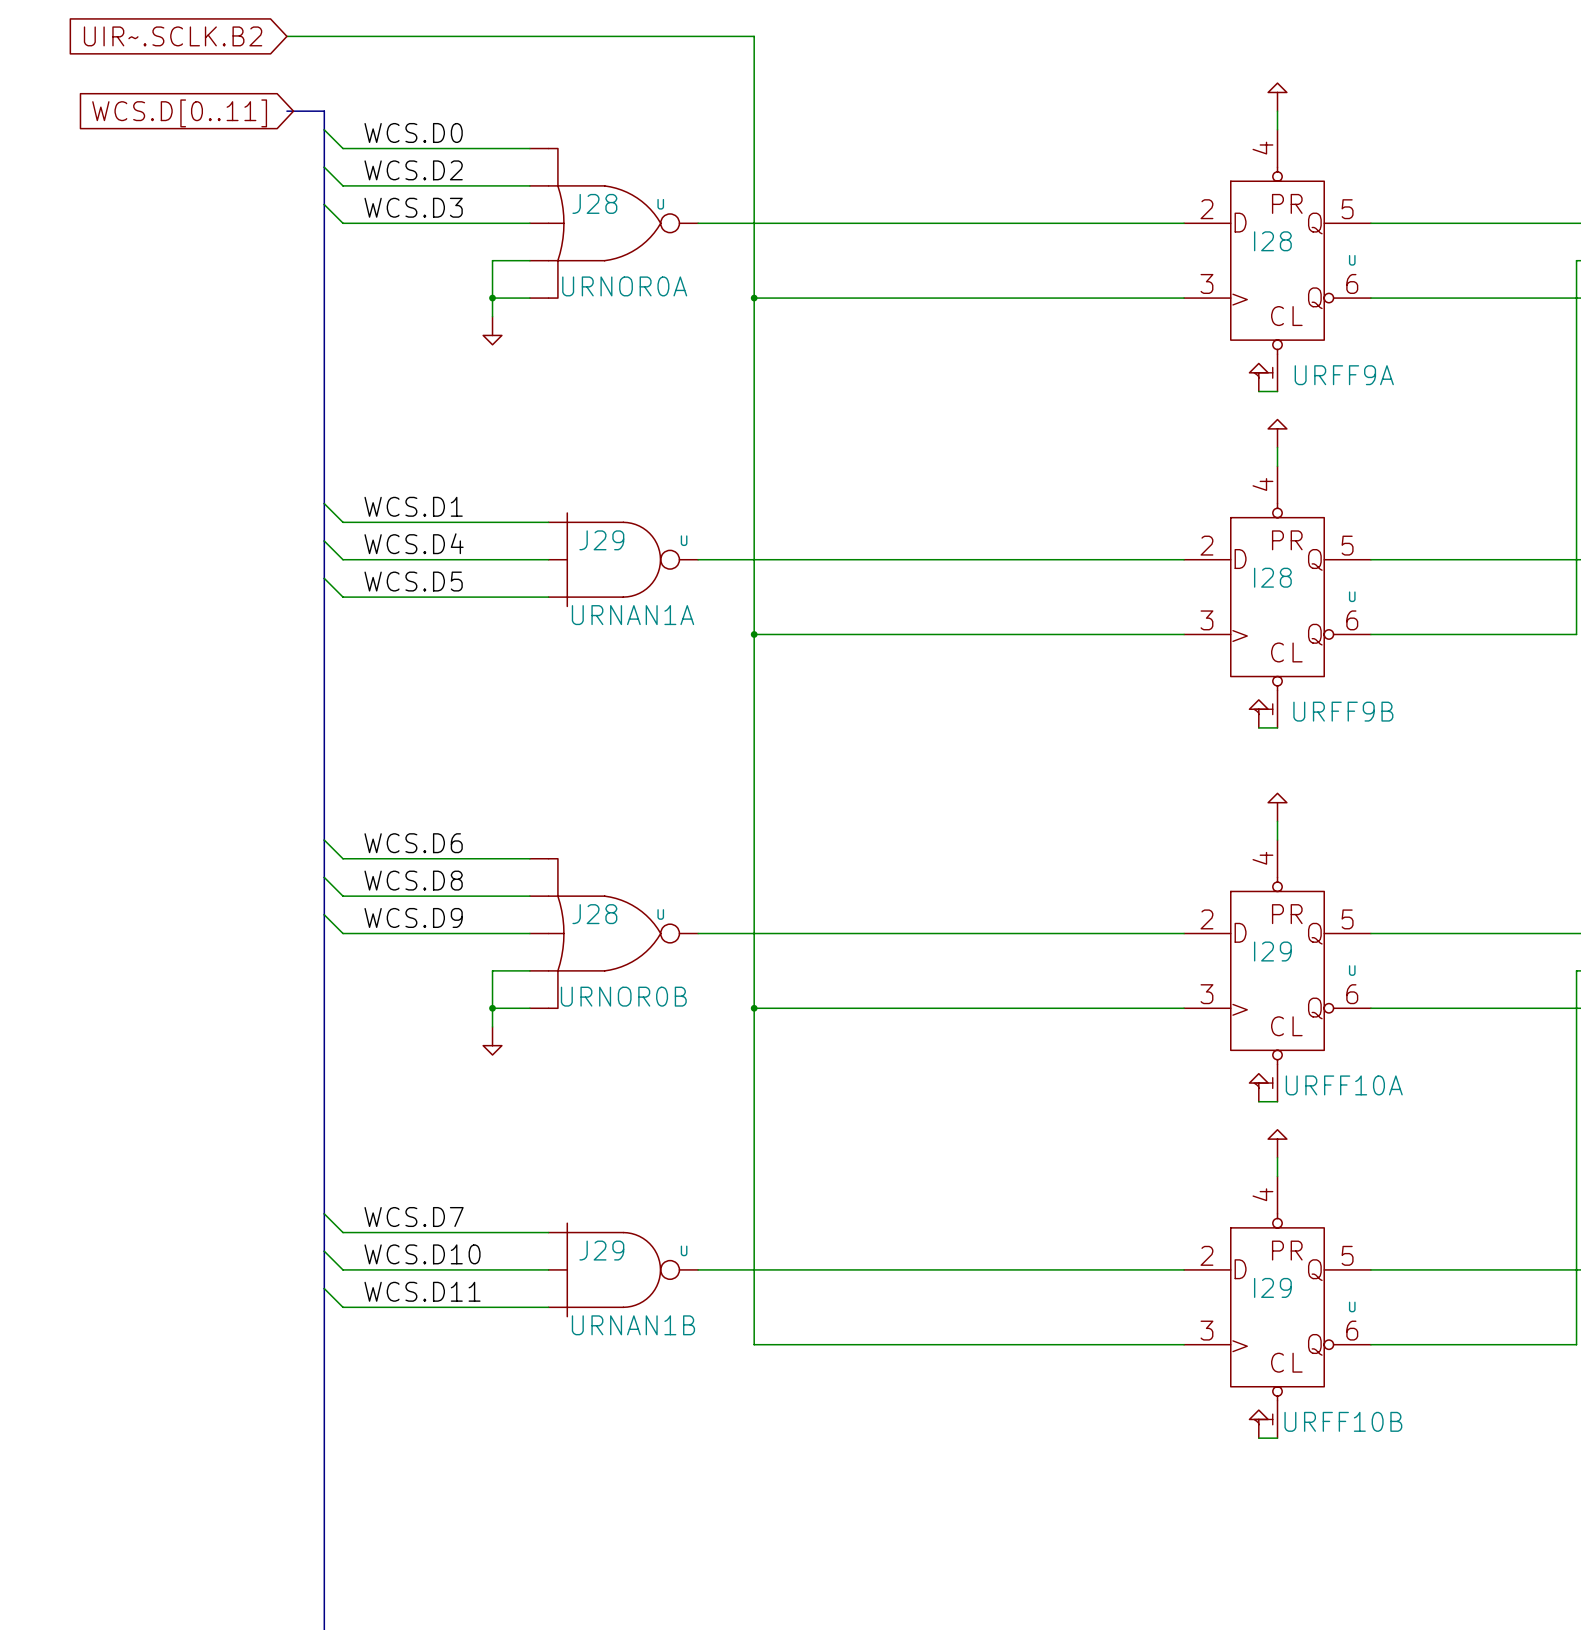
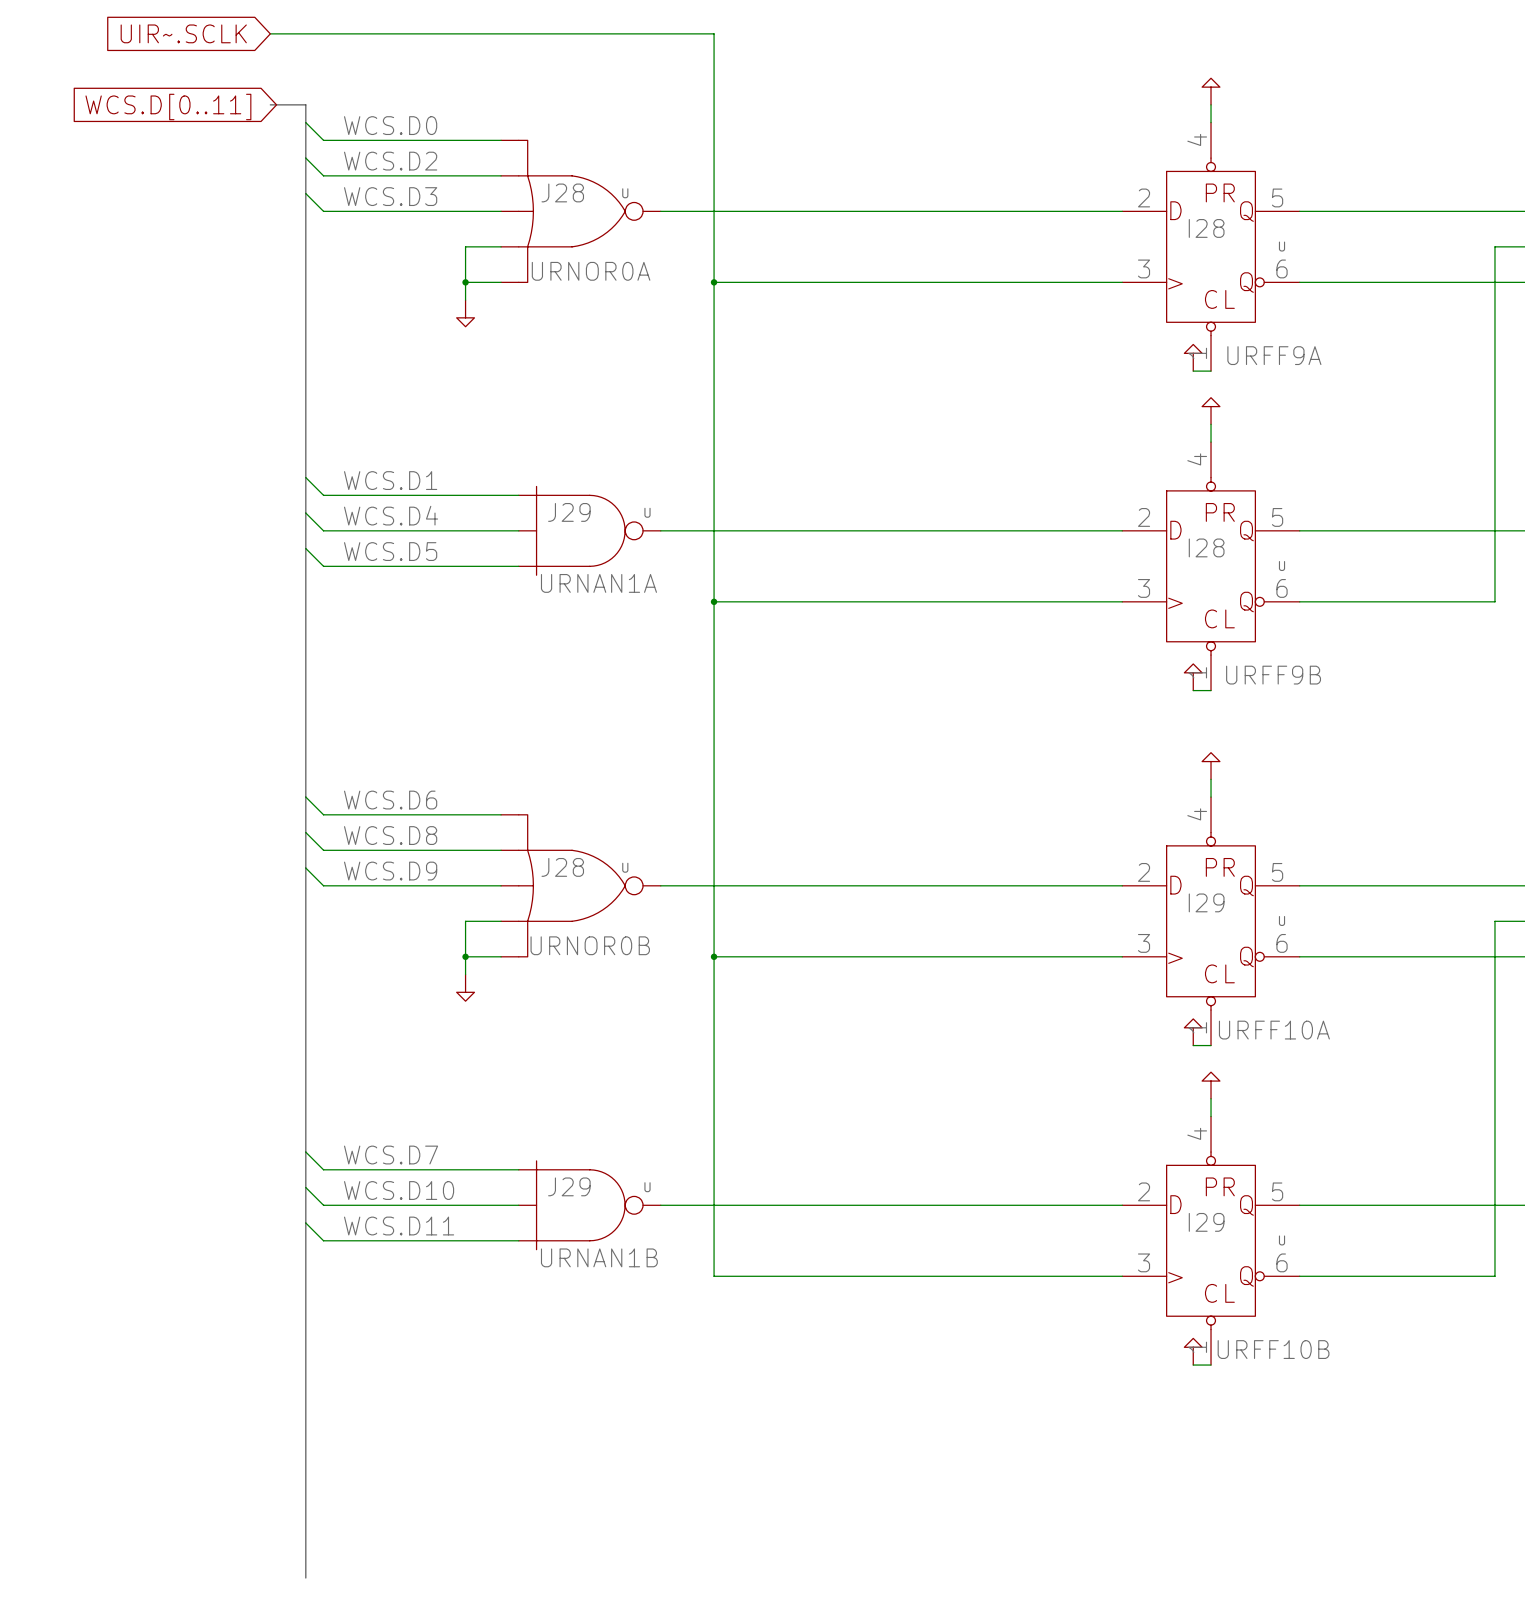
global label: UIR~.SCLK.B2 (173, 36) -> UIR~.SCLK (183, 33)

